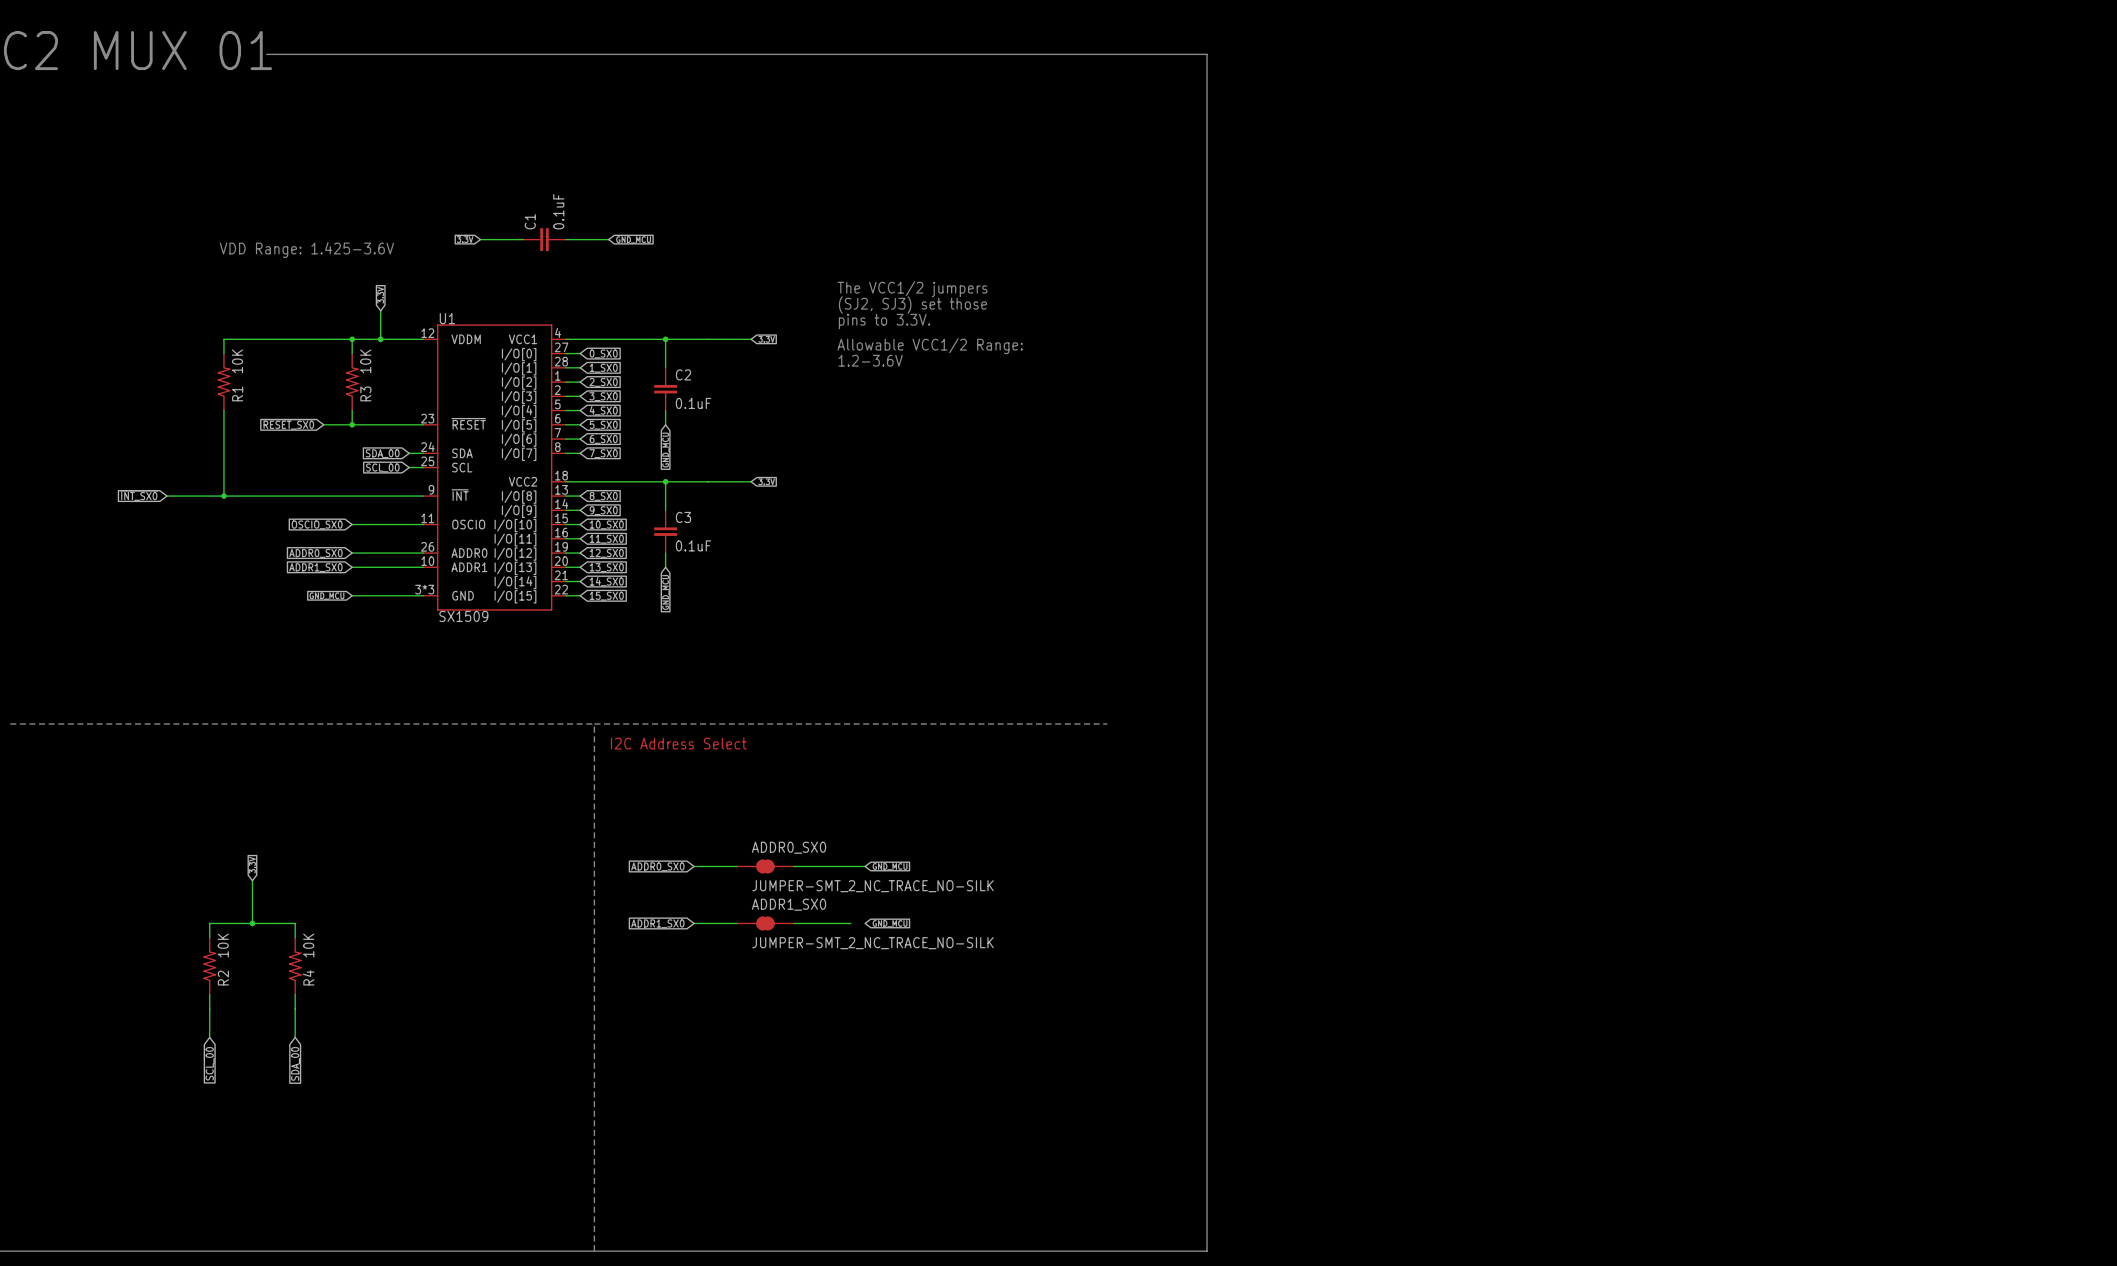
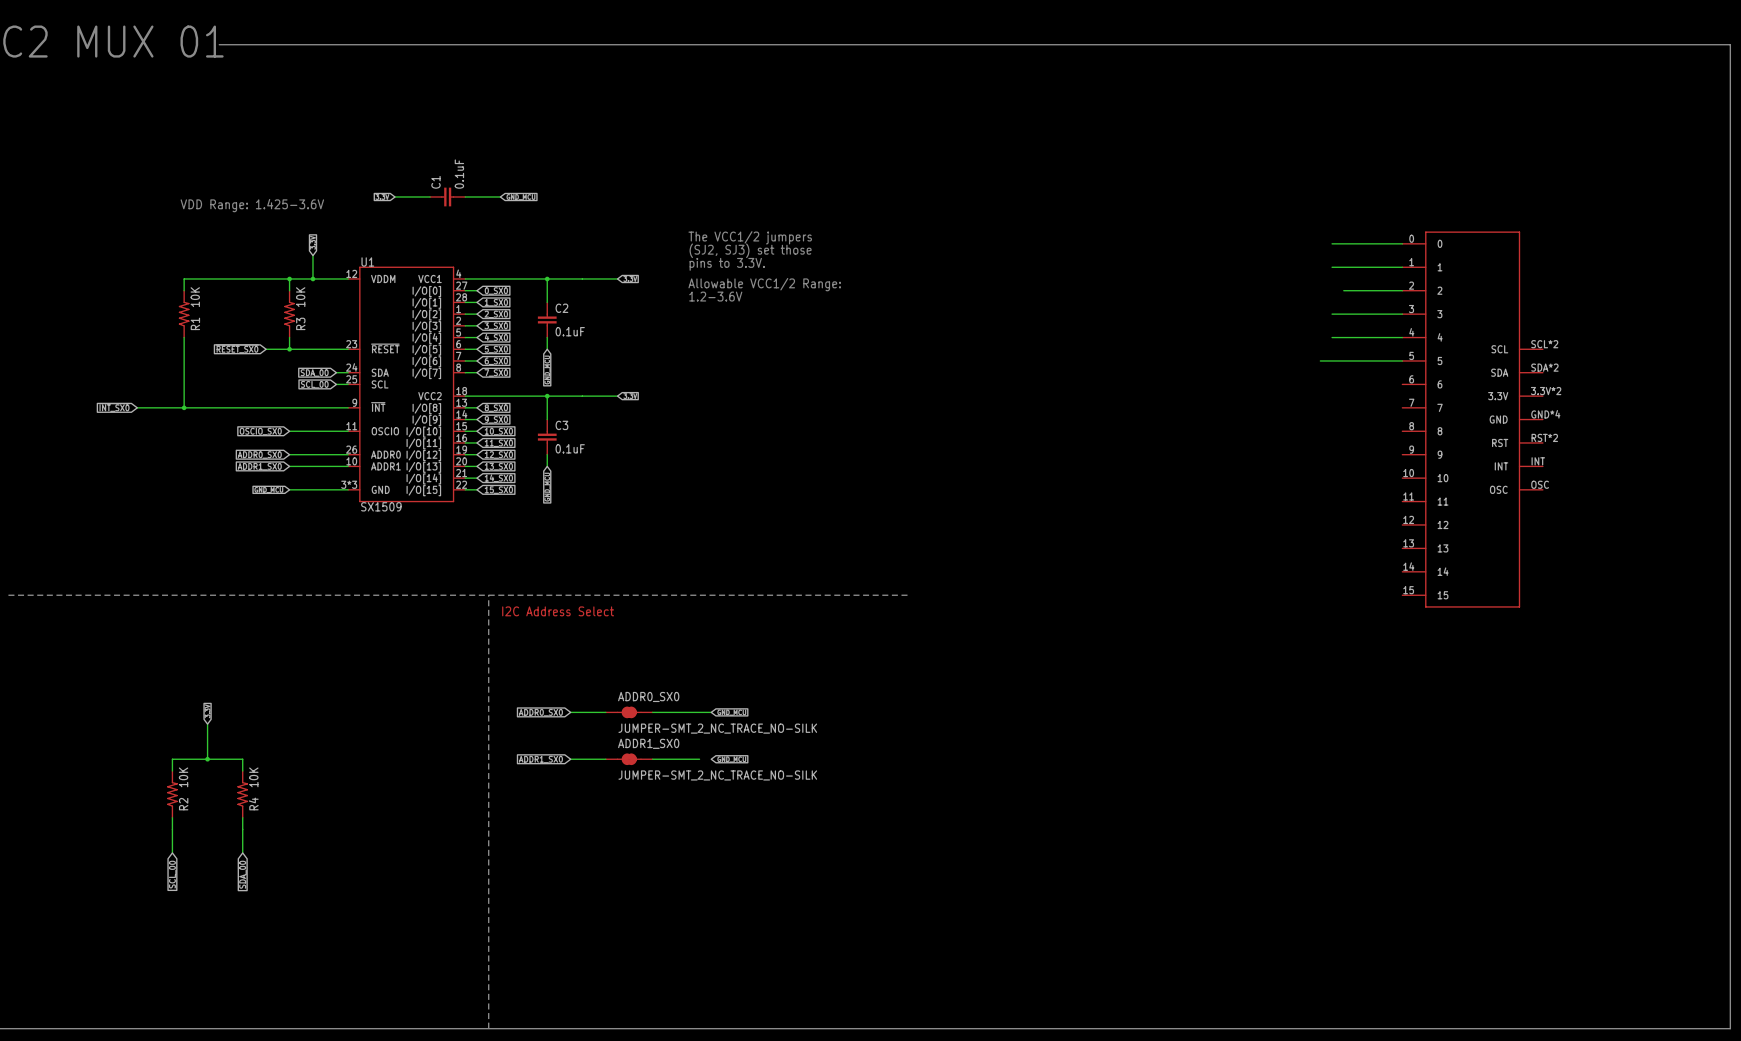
line: (1207, 54) (1207, 1251) -> (992, 44) (1730, 44) (1730, 1028) (992, 1028)
wire: none -> (1332, 243) (1402, 243)
wire: none -> (1332, 267) (1402, 267)
wire: none -> (1343, 290) (1402, 290)
wire: none -> (1332, 314) (1402, 314)
wire: none -> (1332, 337) (1402, 337)
wire: none -> (1320, 360) (1402, 360)
part: none -> (1472, 419)

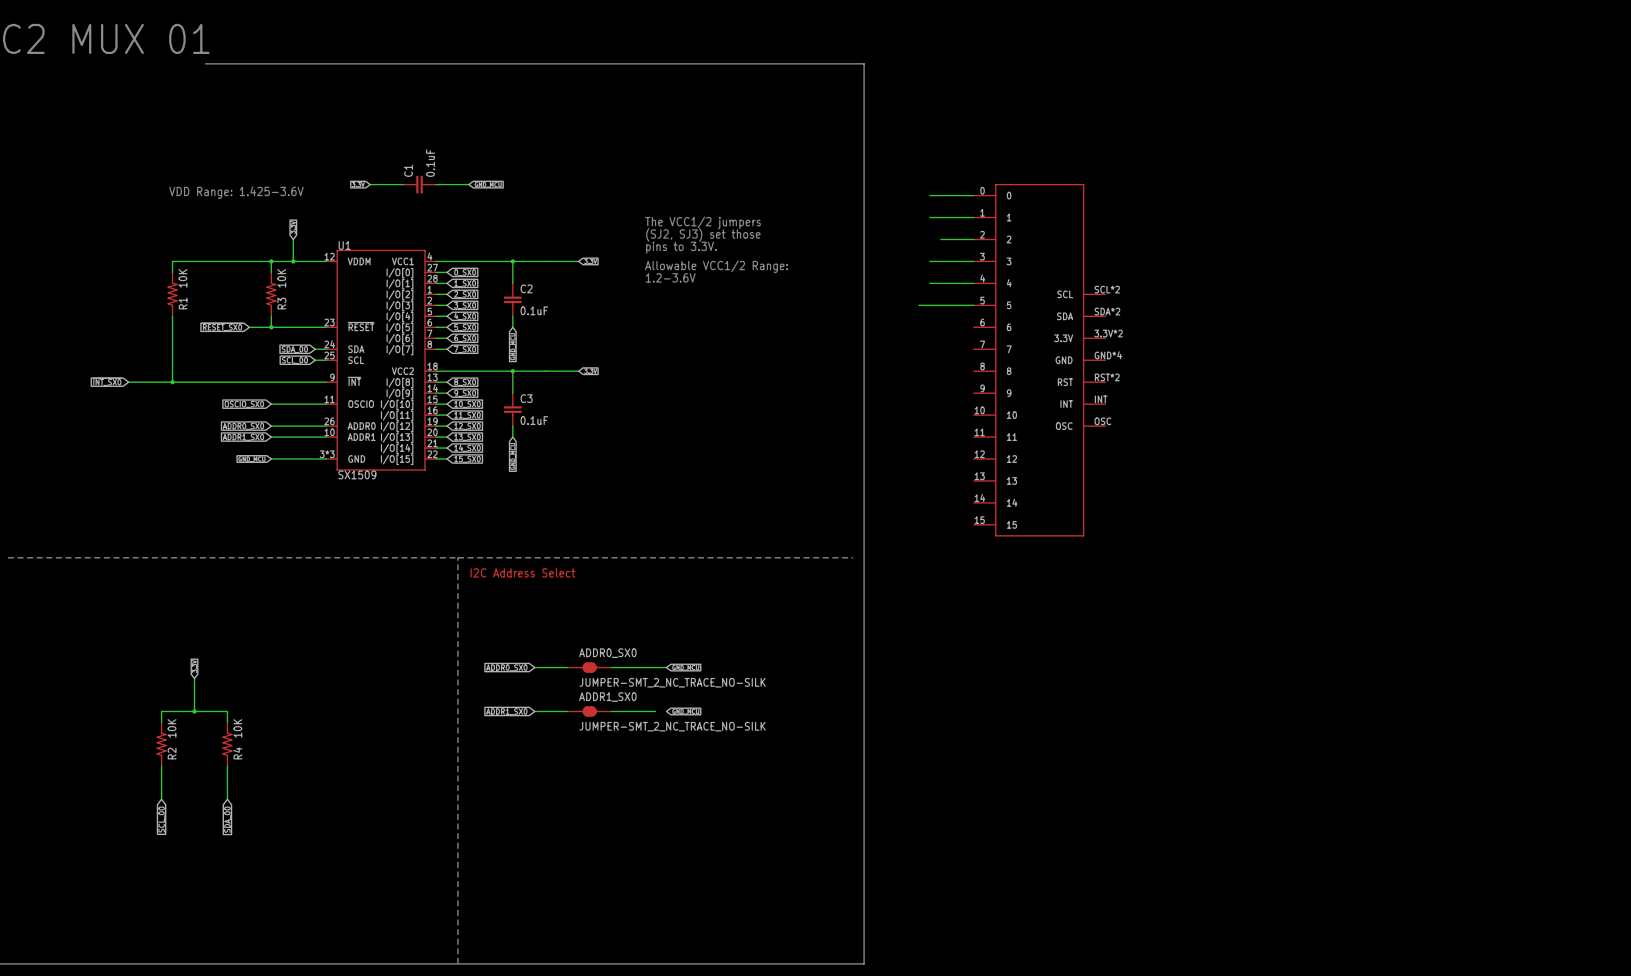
line: (219, 44) (1730, 44) (1730, 1028) (922, 1028) -> (205, 63) (864, 63) (864, 963)
wire: none -> (929, 195) (973, 195)
wire: none -> (929, 217) (973, 217)
wire: (1332, 243) (1402, 243) -> none
wire: none -> (940, 239) (973, 239)
wire: (1332, 267) (1402, 267) -> none
wire: none -> (929, 261) (973, 261)
wire: (1343, 290) (1402, 290) -> none
wire: none -> (929, 283) (973, 283)
wire: (1332, 314) (1402, 314) -> none
wire: none -> (918, 305) (973, 305)
wire: (1332, 337) (1402, 337) -> none
wire: (1320, 360) (1402, 360) -> none
part: none -> (1039, 360)
part: (1472, 419) -> none

